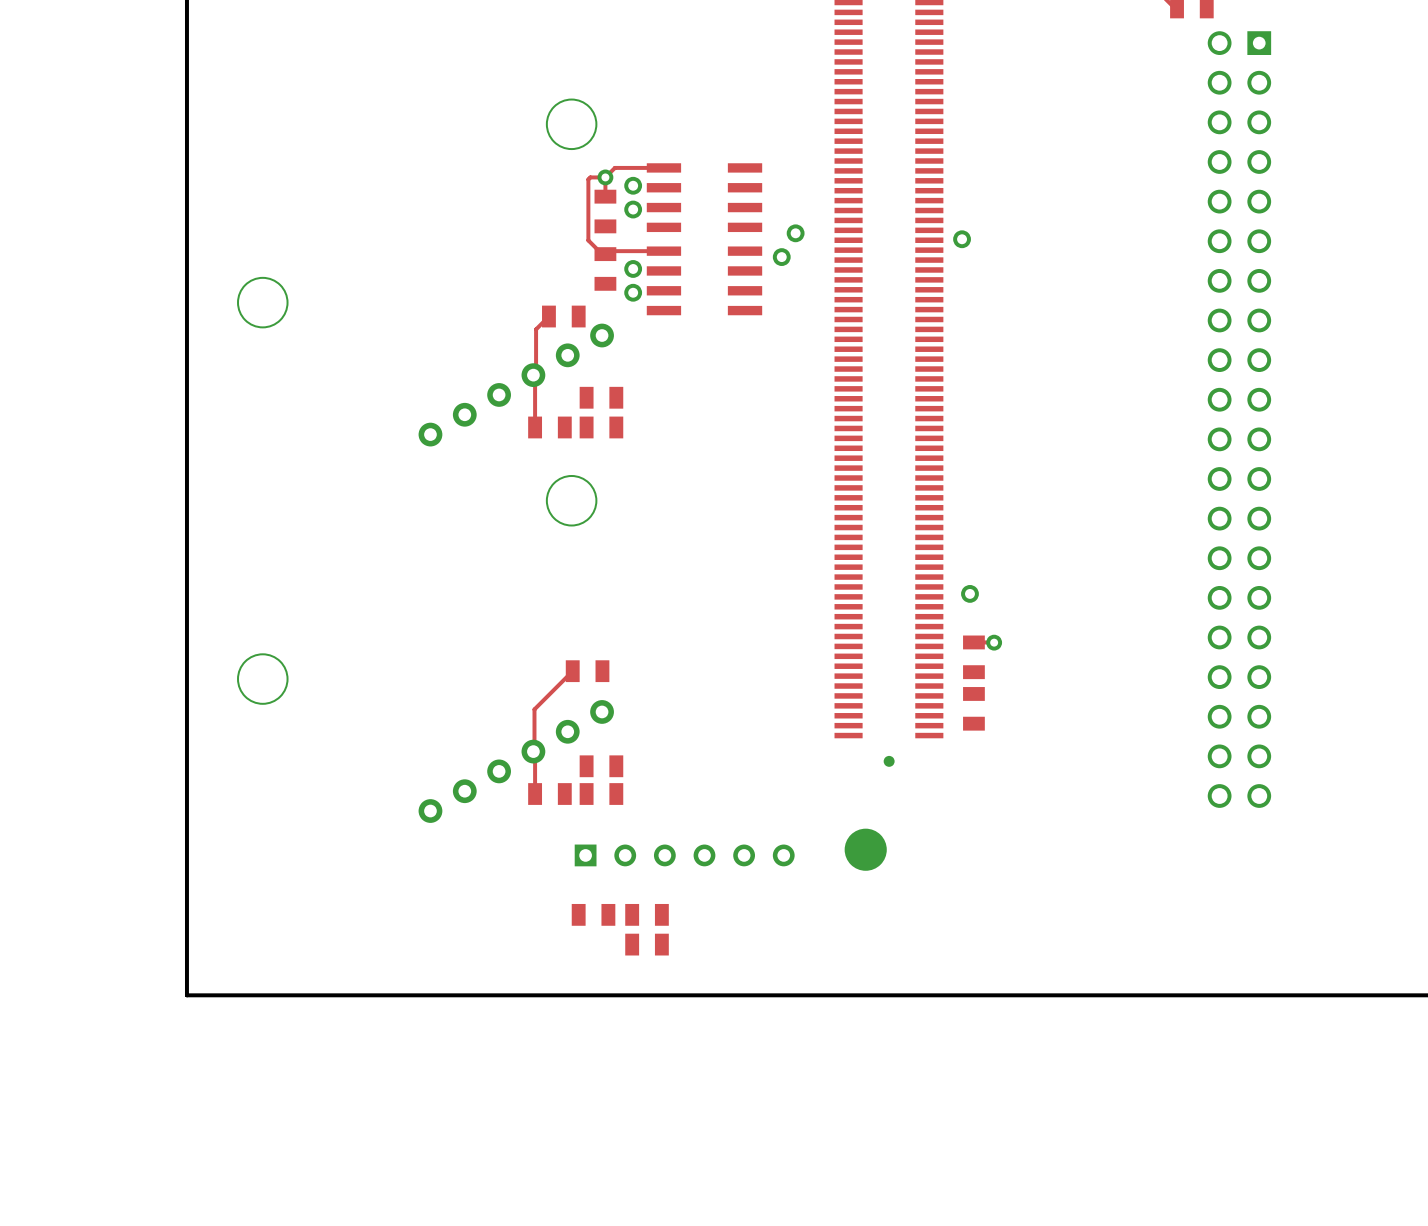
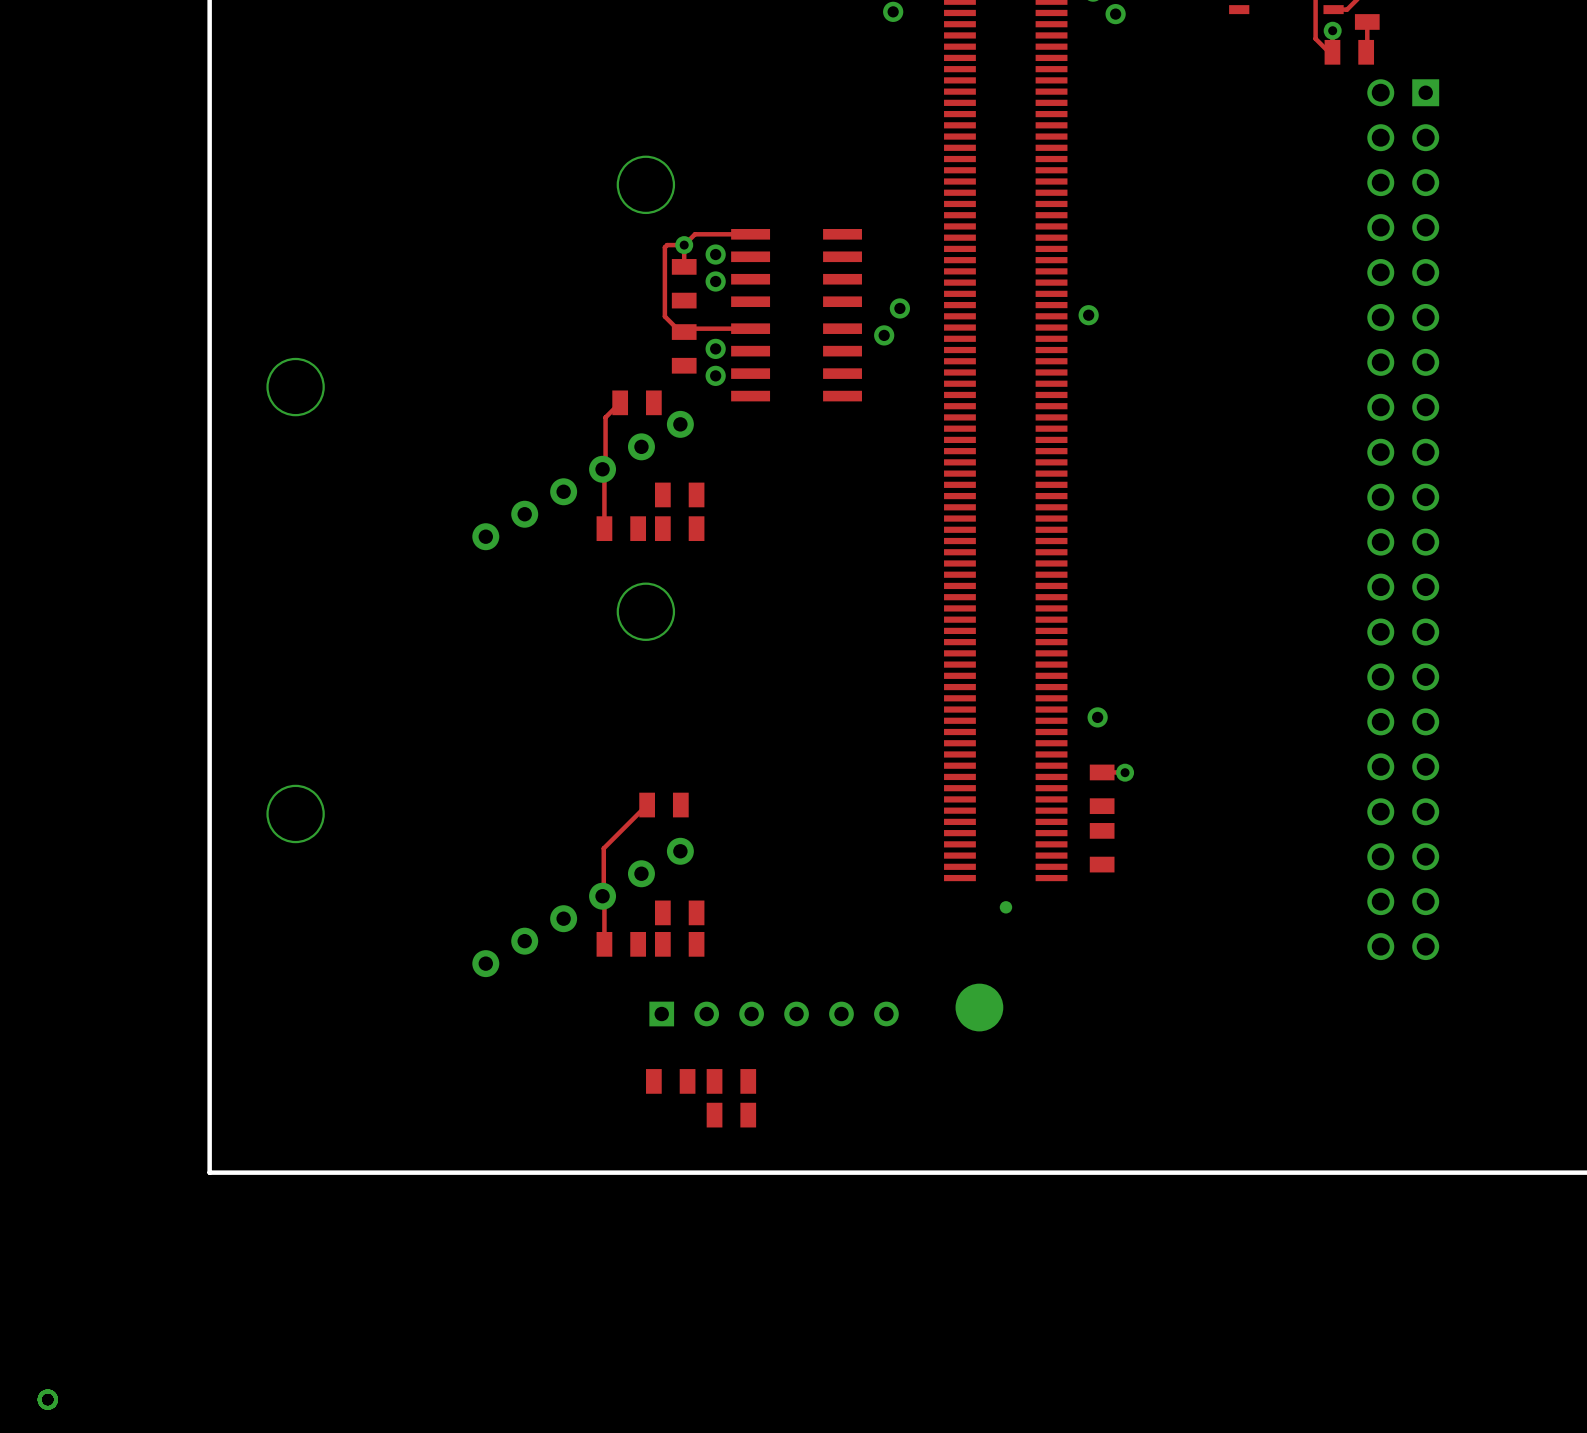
part: none -> (47, 1399)

